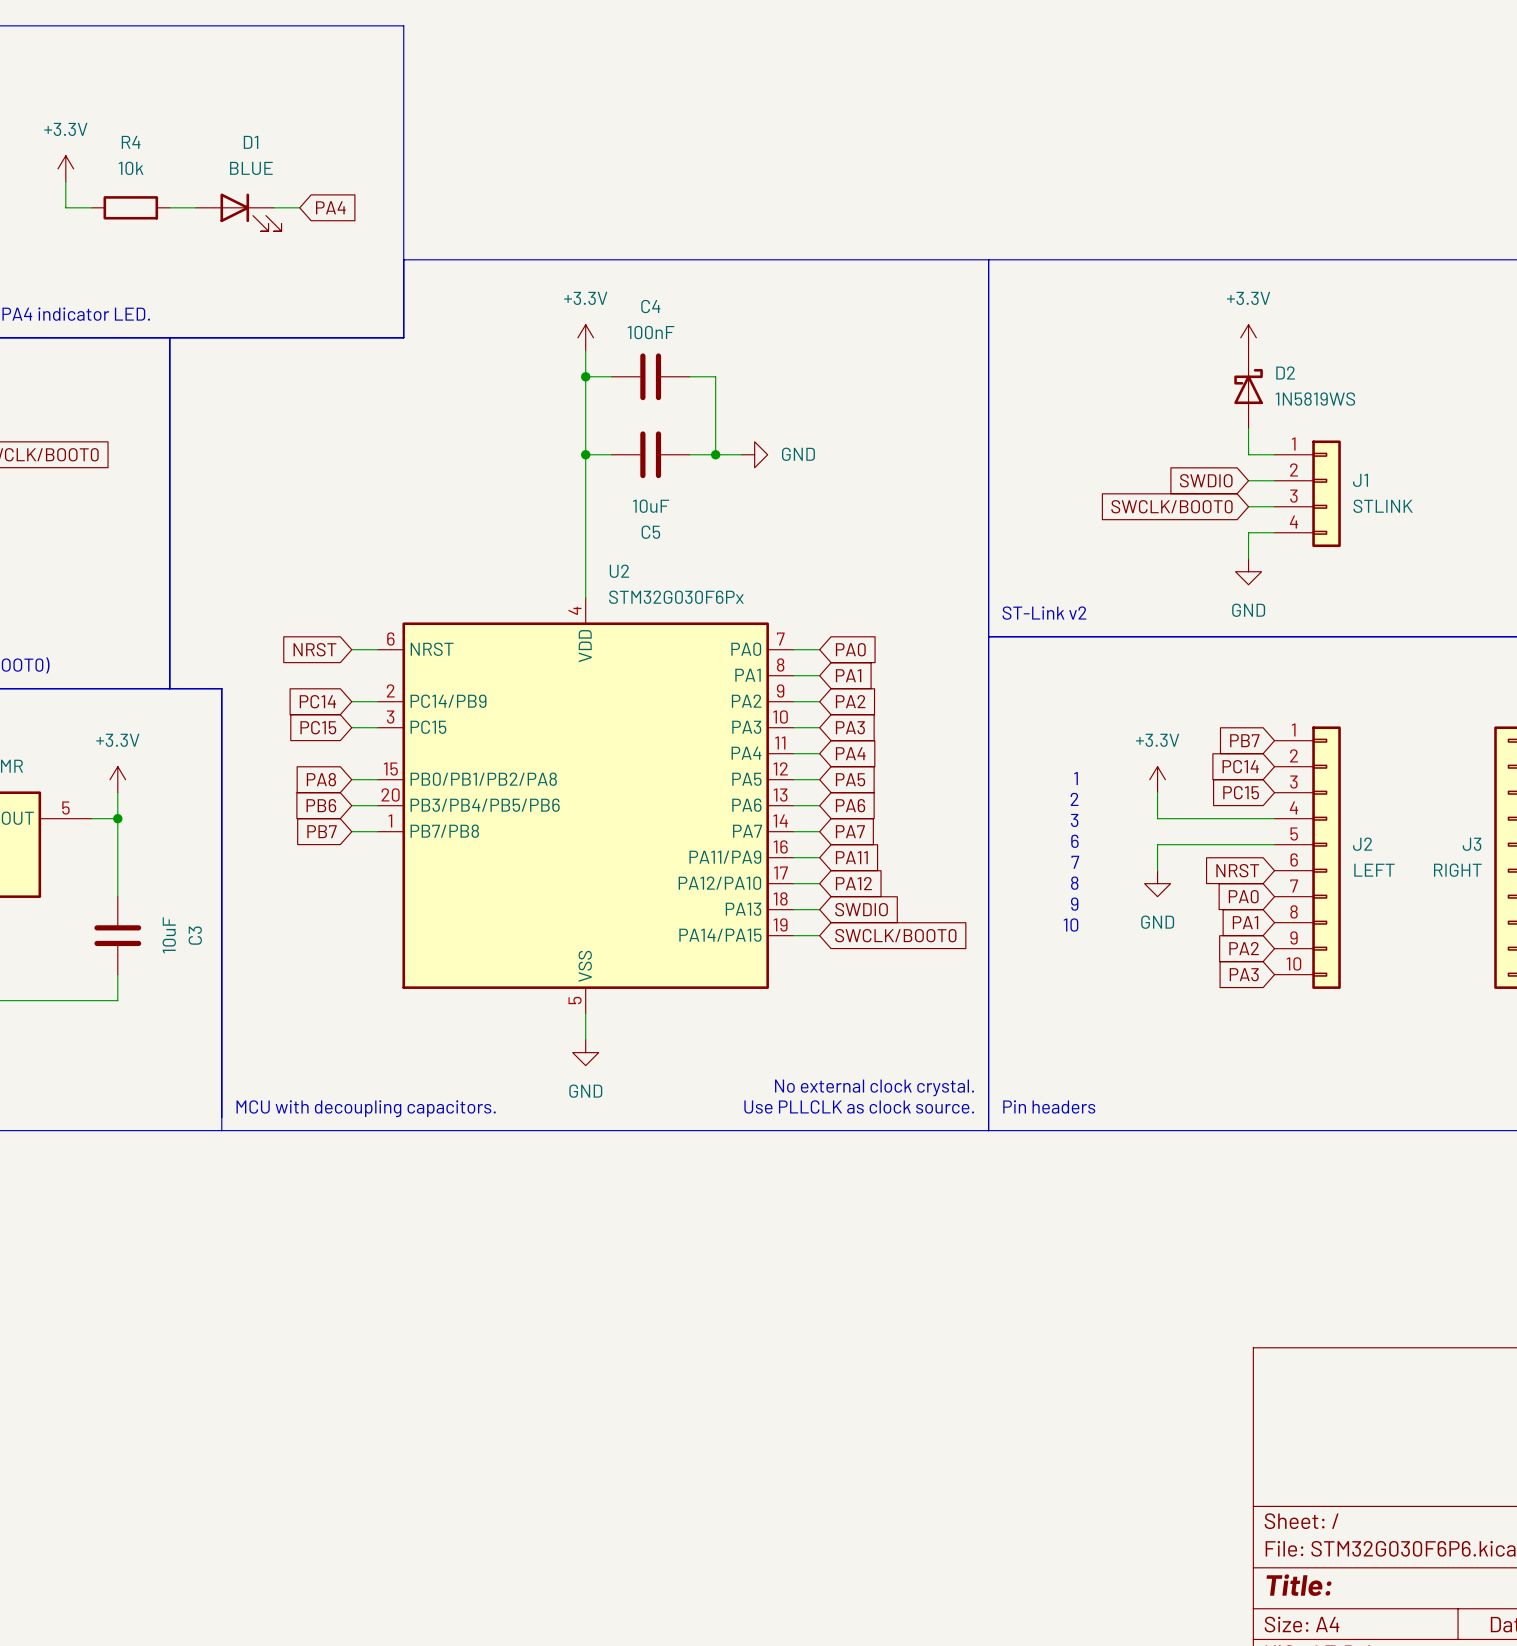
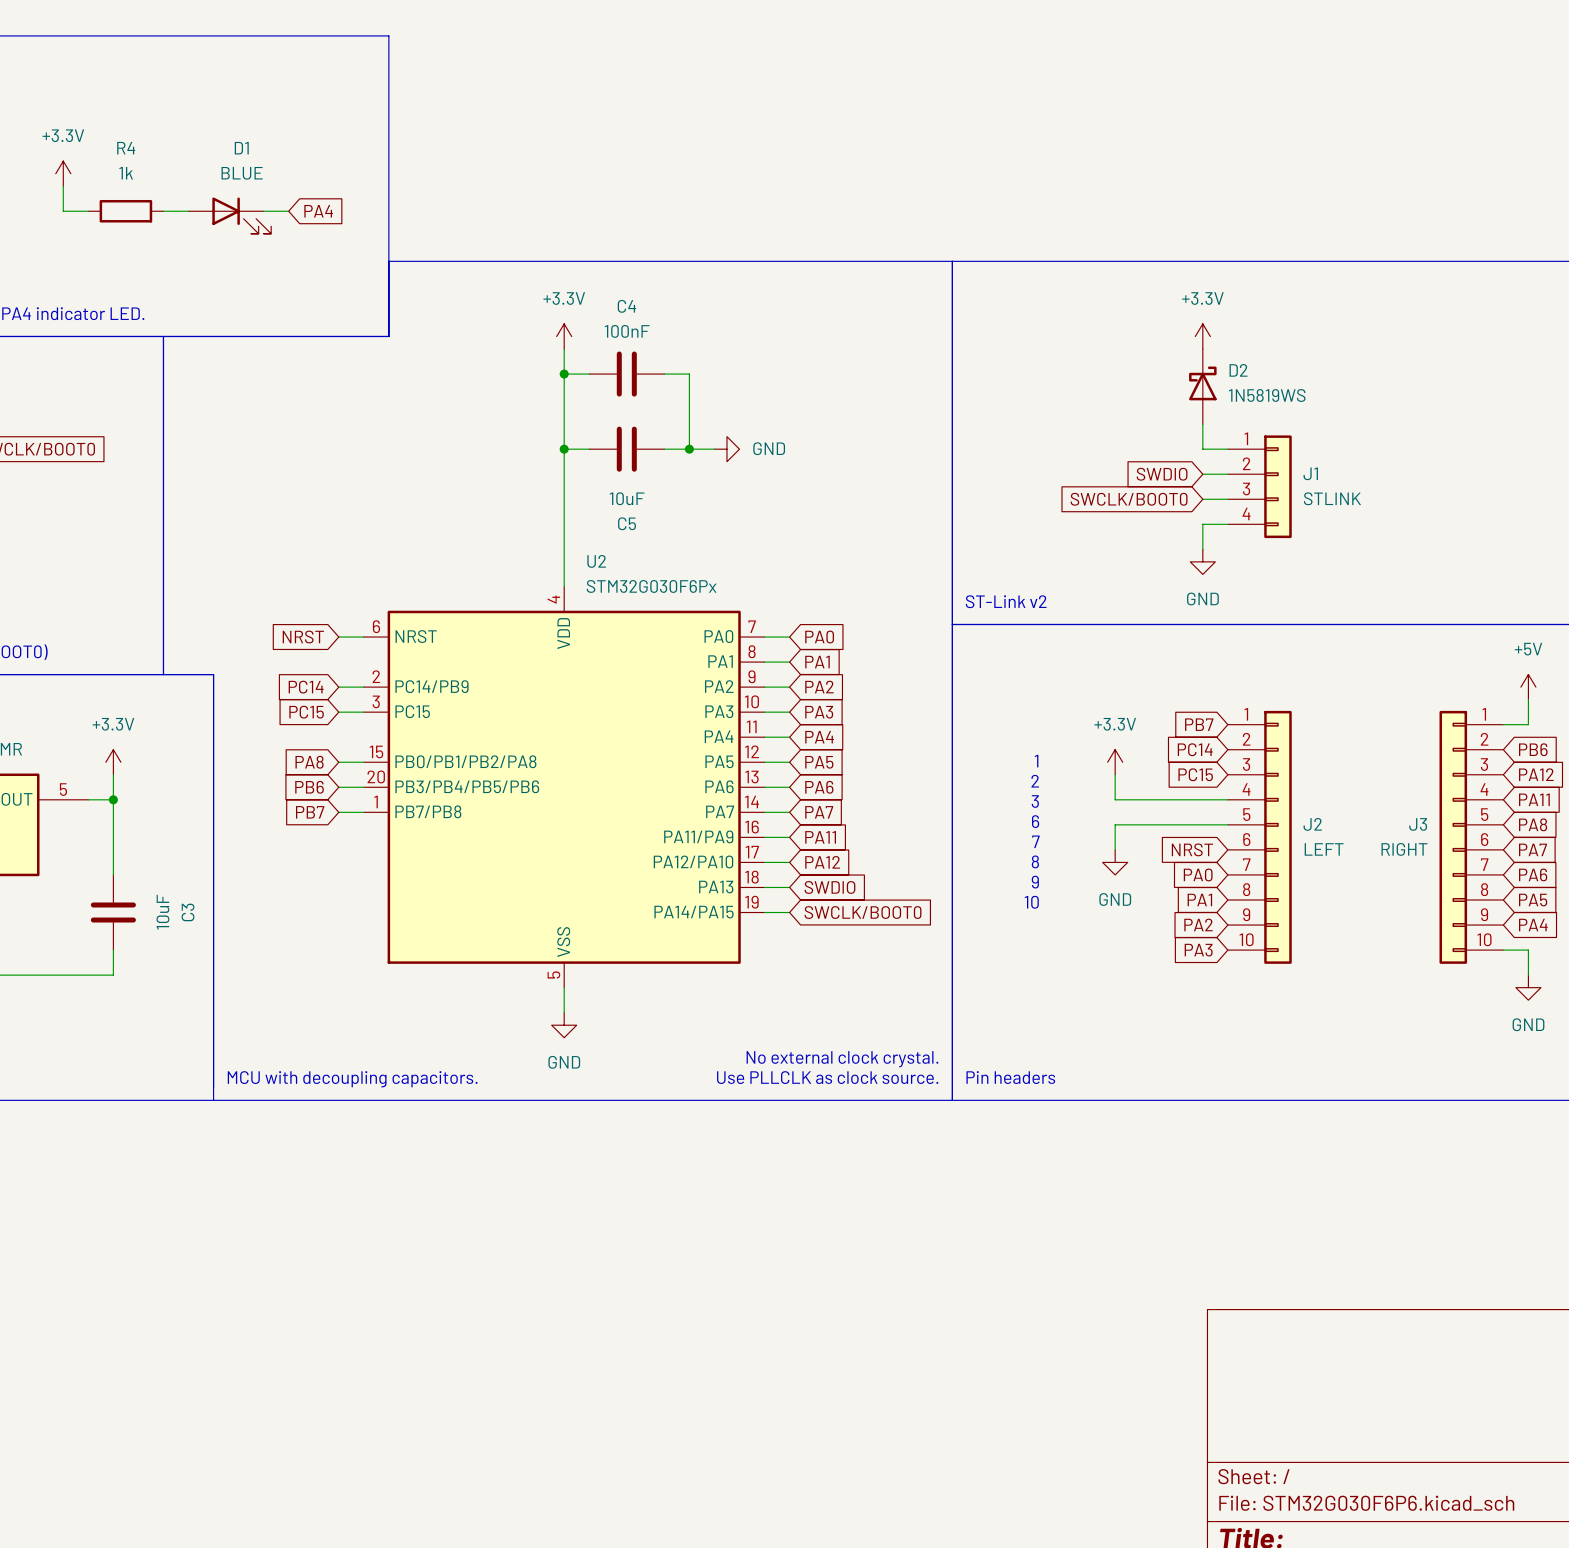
R4 value: 10k (131, 168) -> 1k (126, 173)

